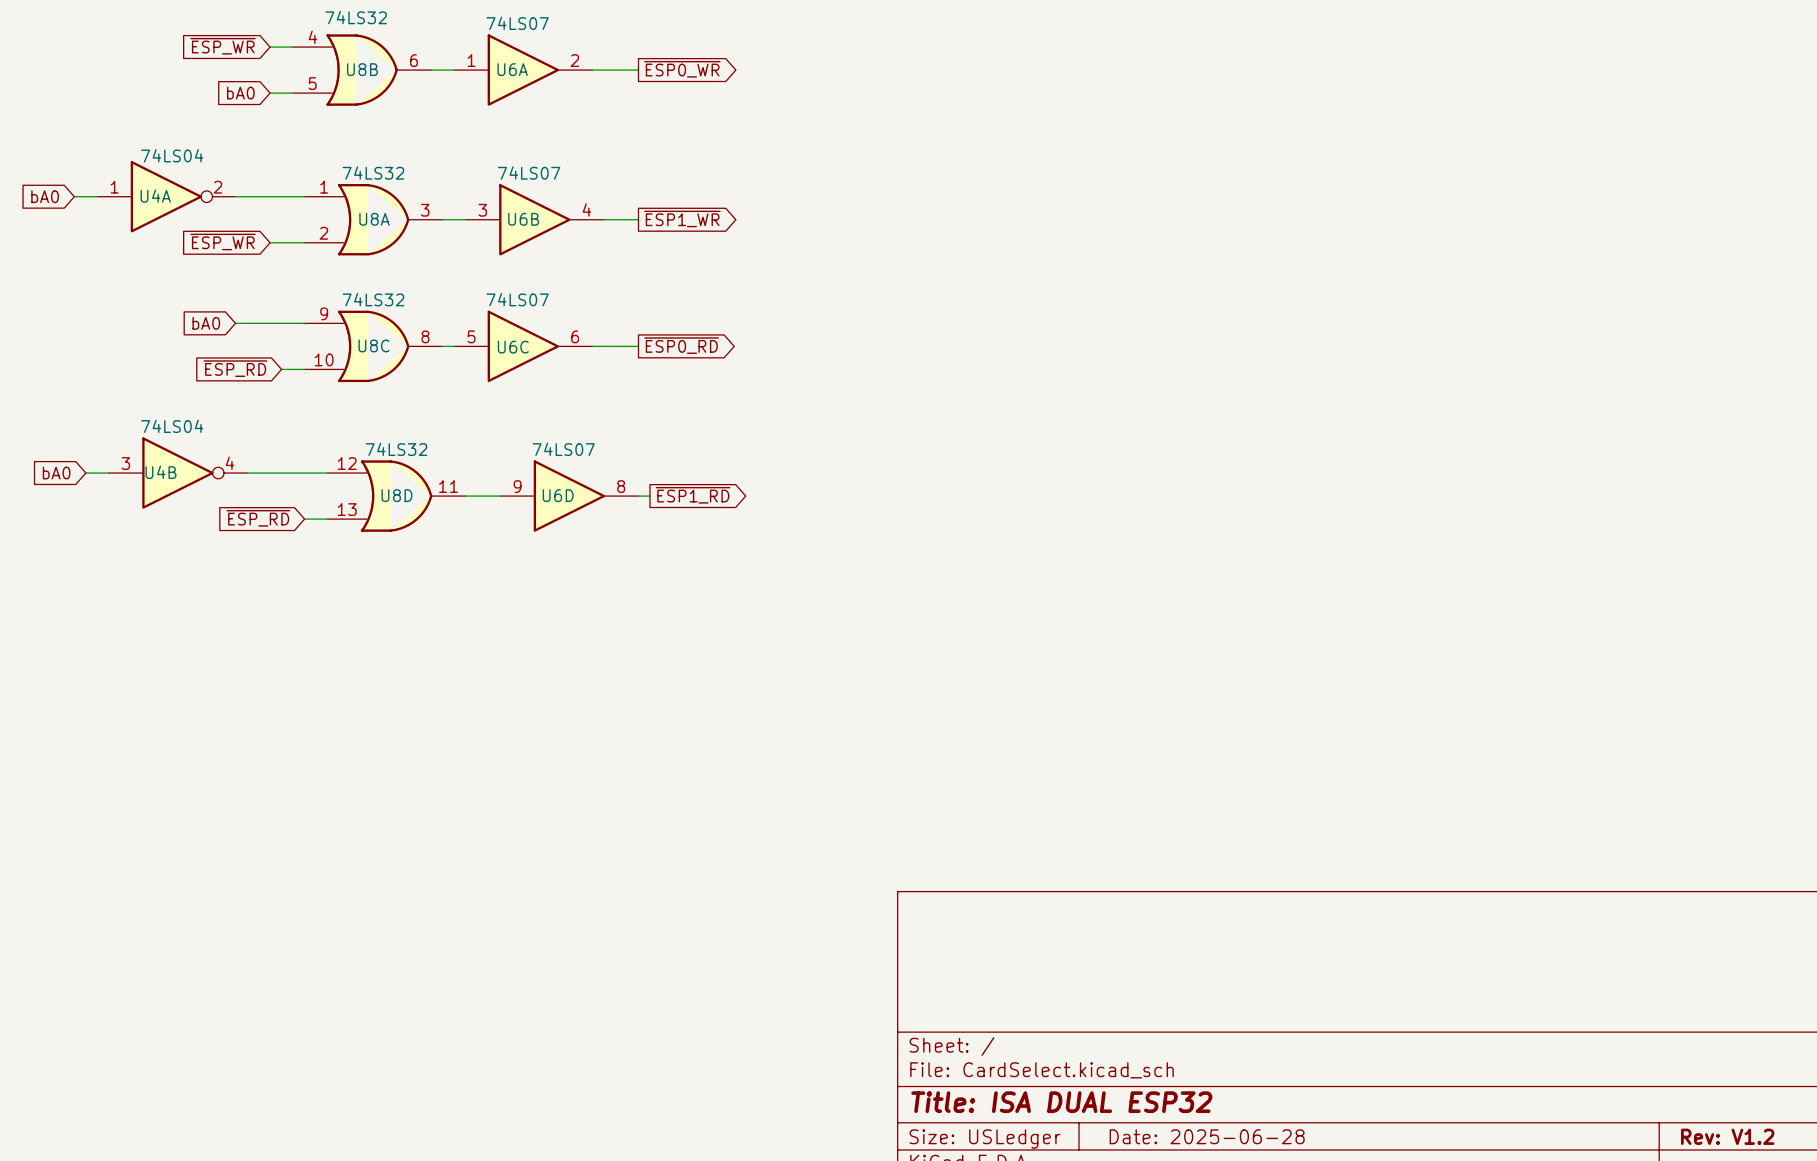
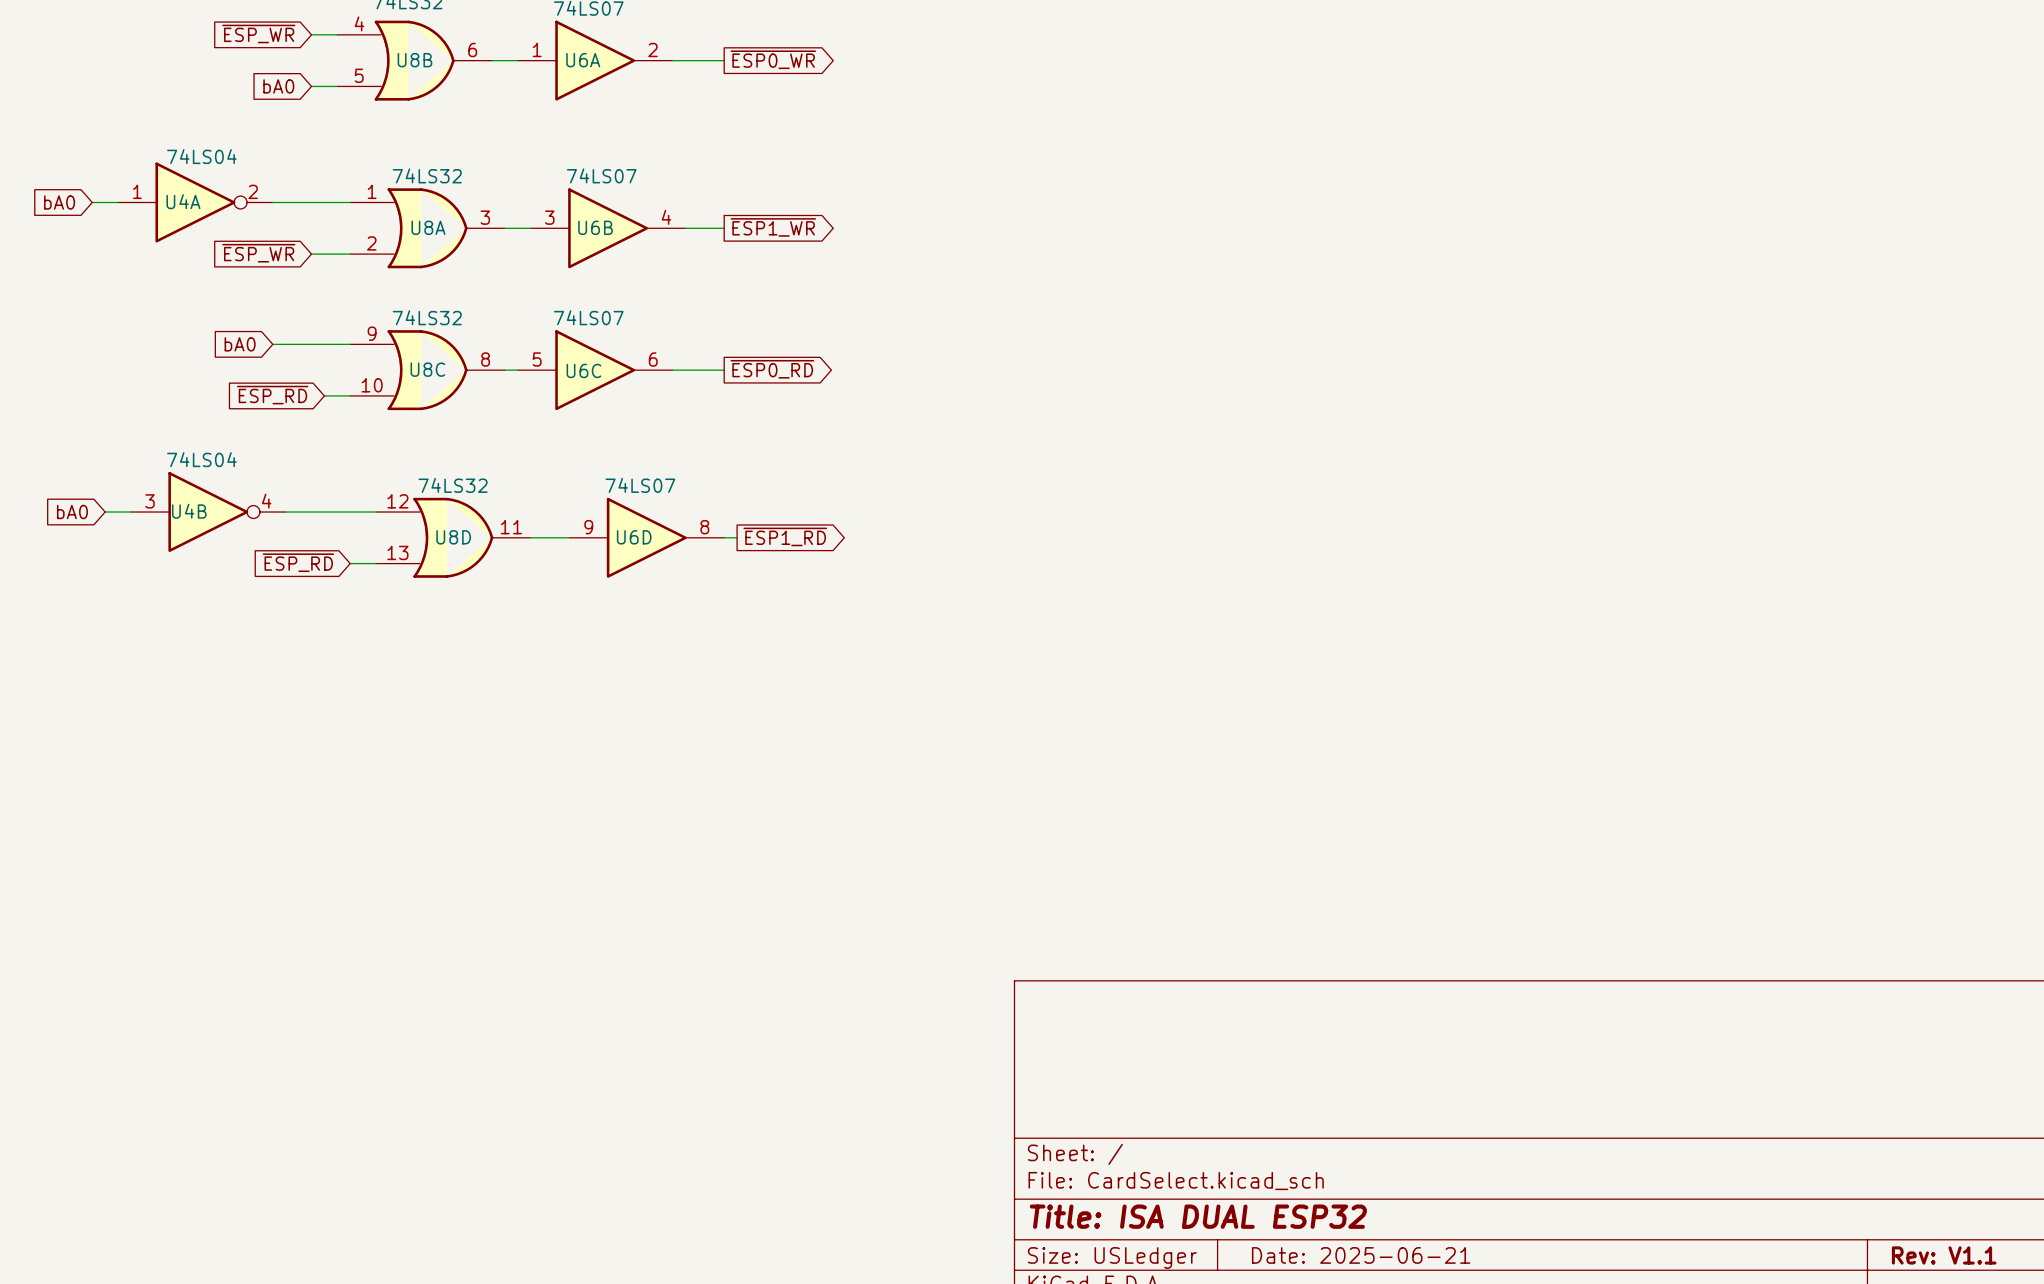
title block: Date: 2025-06-28 (1207, 1136) -> Date: 2025-06-21 (1361, 1255)
title block: Rev: V1.2 (1727, 1136) -> Rev: V1.1 (1944, 1255)

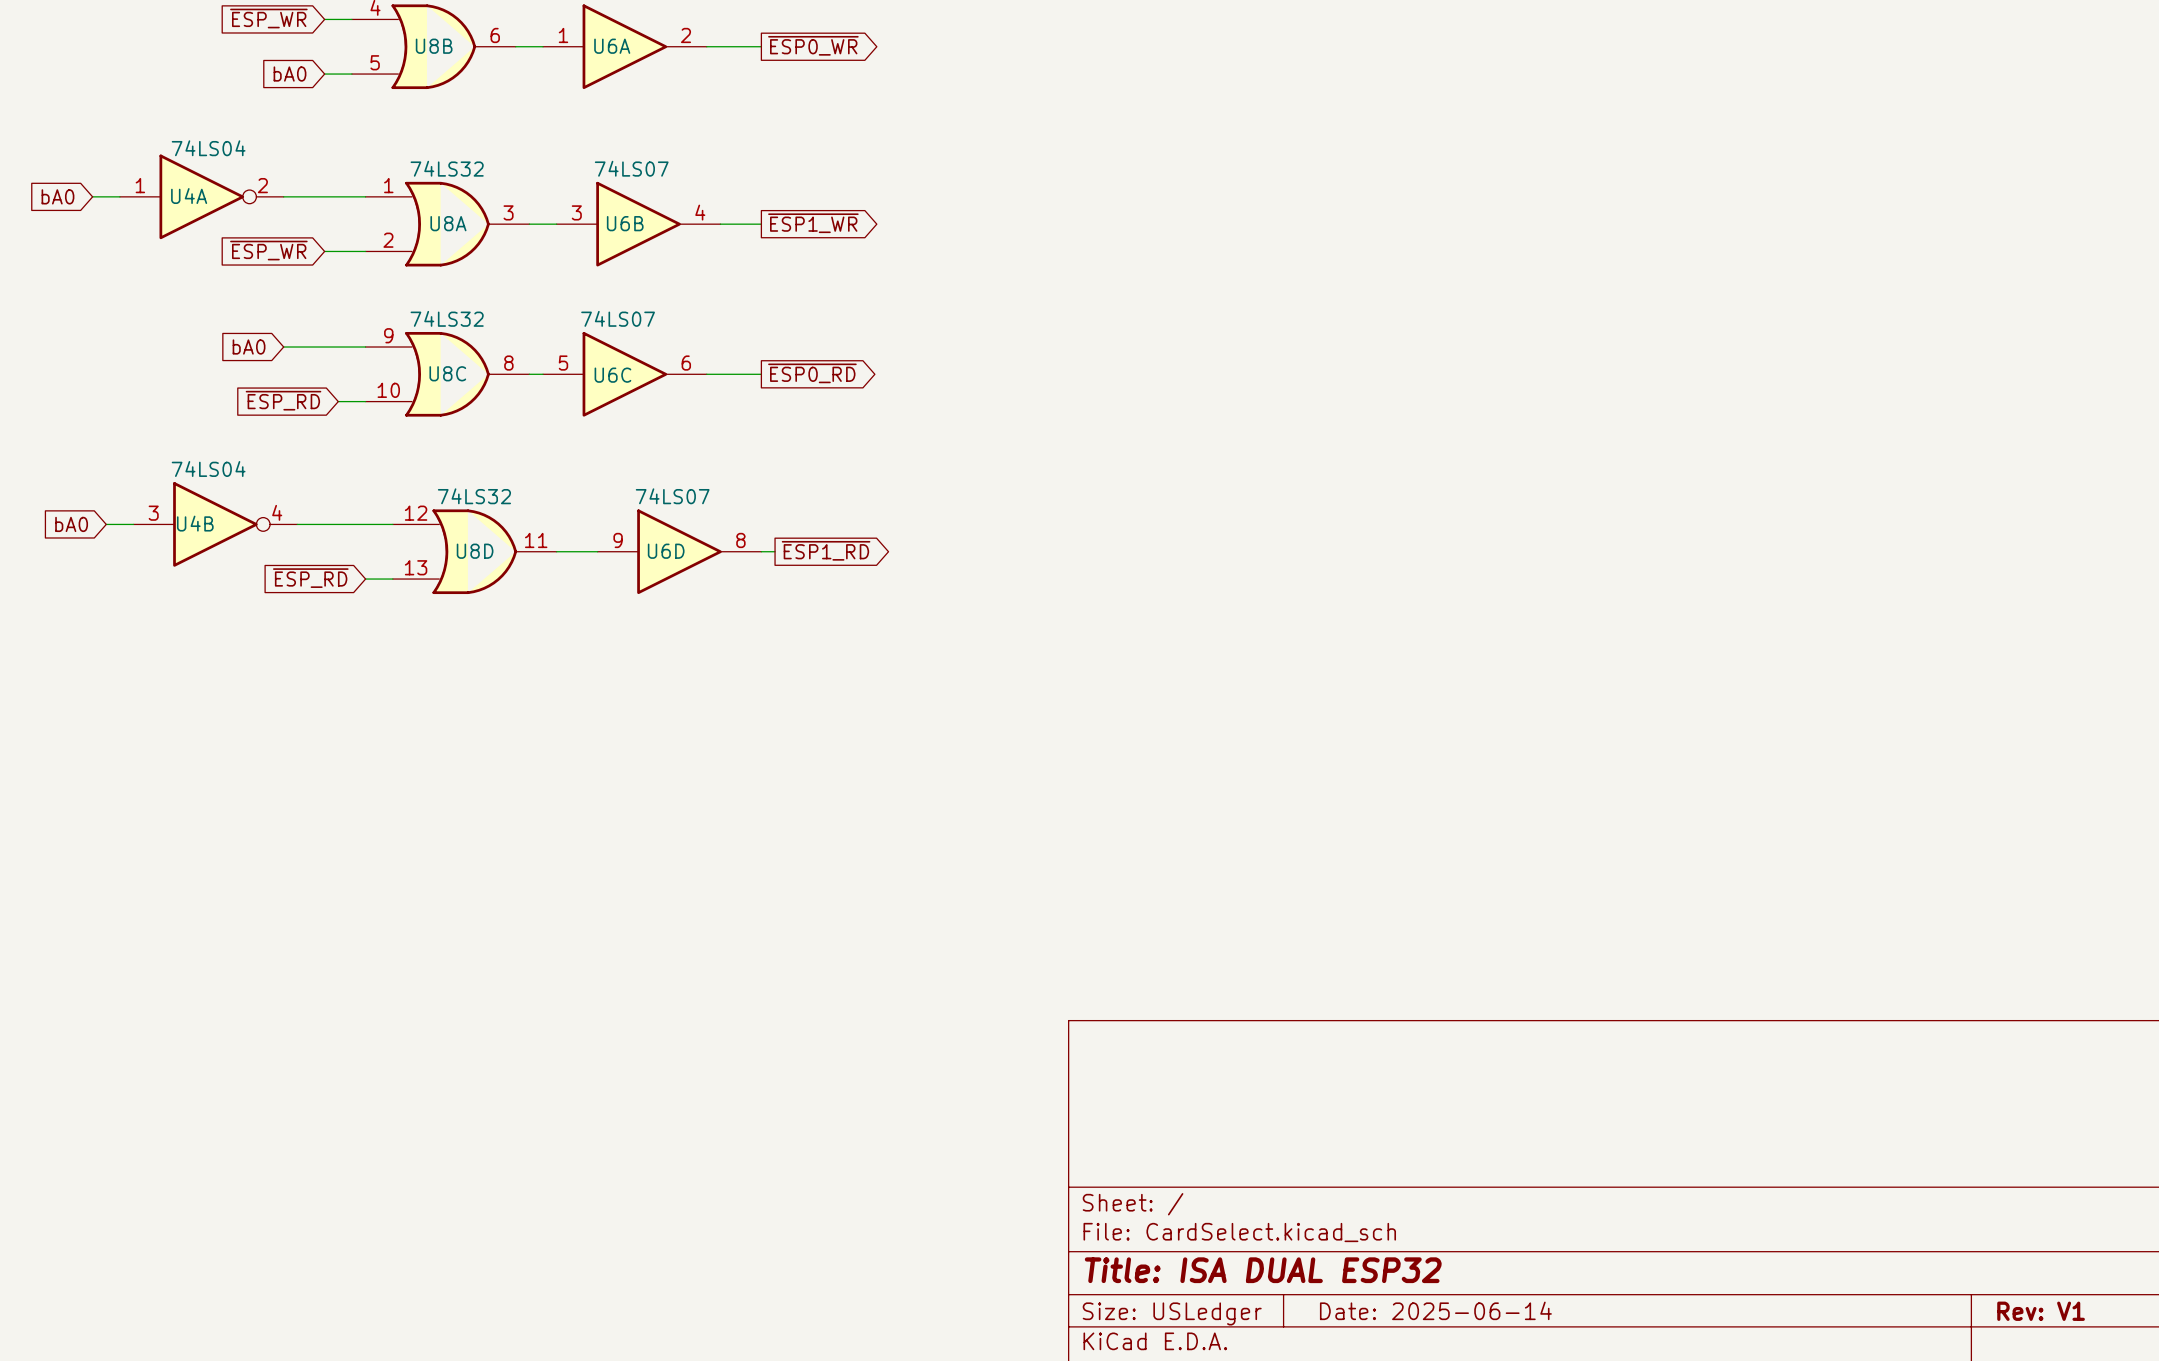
title block: Date: 2025-06-21 (1361, 1255) -> Date: 2025-06-14 (1435, 1310)
title block: Rev: V1.1 (1944, 1255) -> Rev: V1 (2041, 1311)

